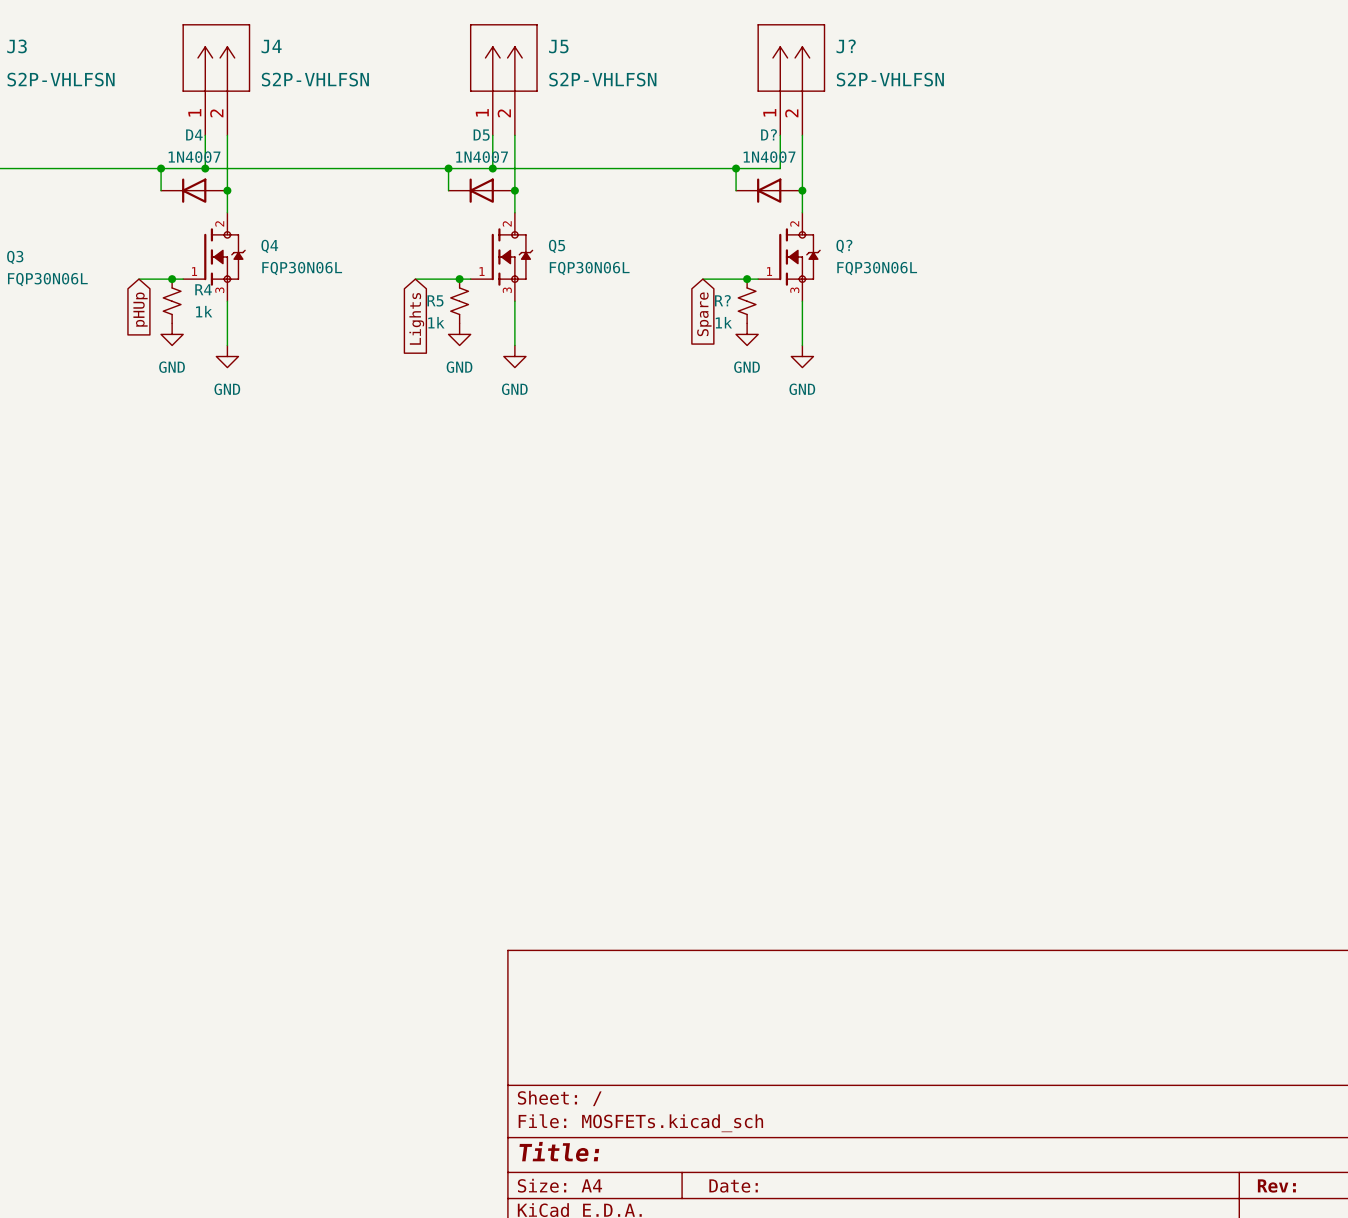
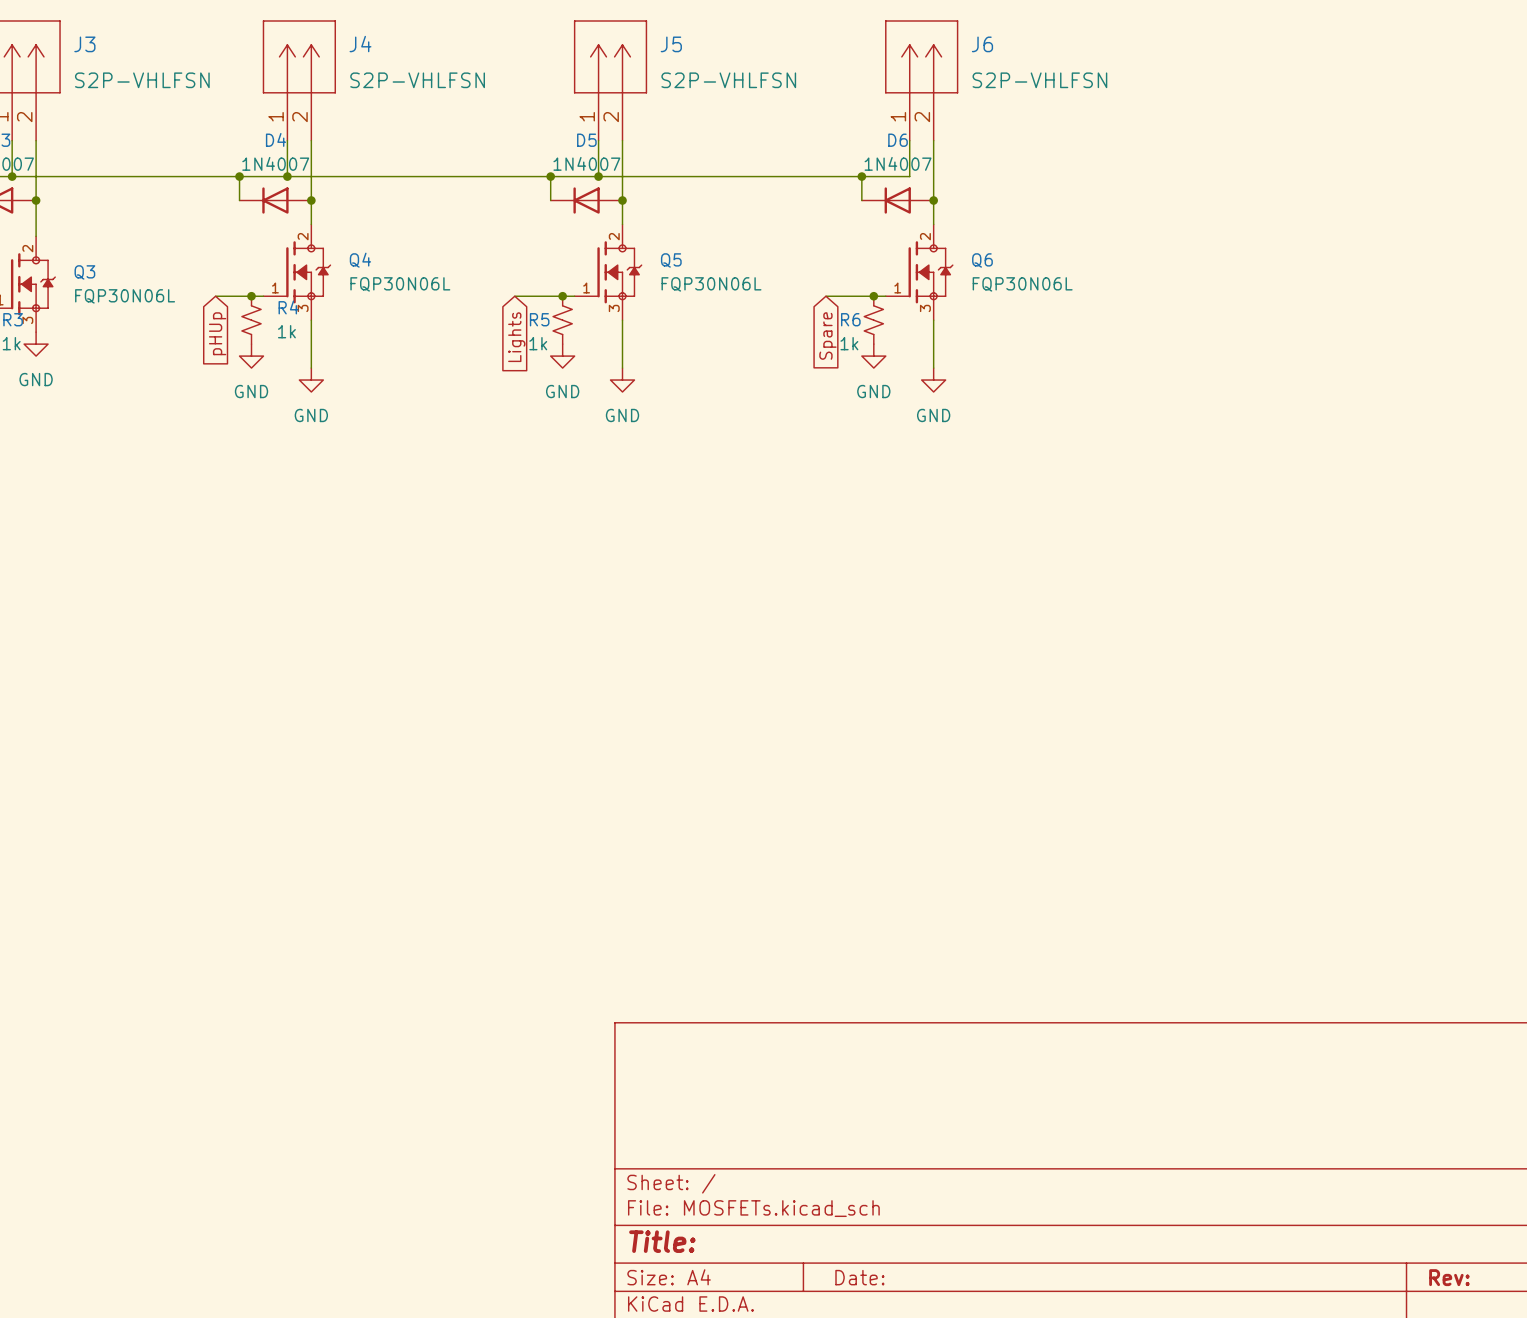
J? name: J? (846, 46) -> J6 (982, 44)
D? name: D? (769, 134) -> D6 (898, 140)
Q? name: Q? (844, 246) -> Q6 (982, 260)
R? name: R? (722, 300) -> R6 (850, 319)

